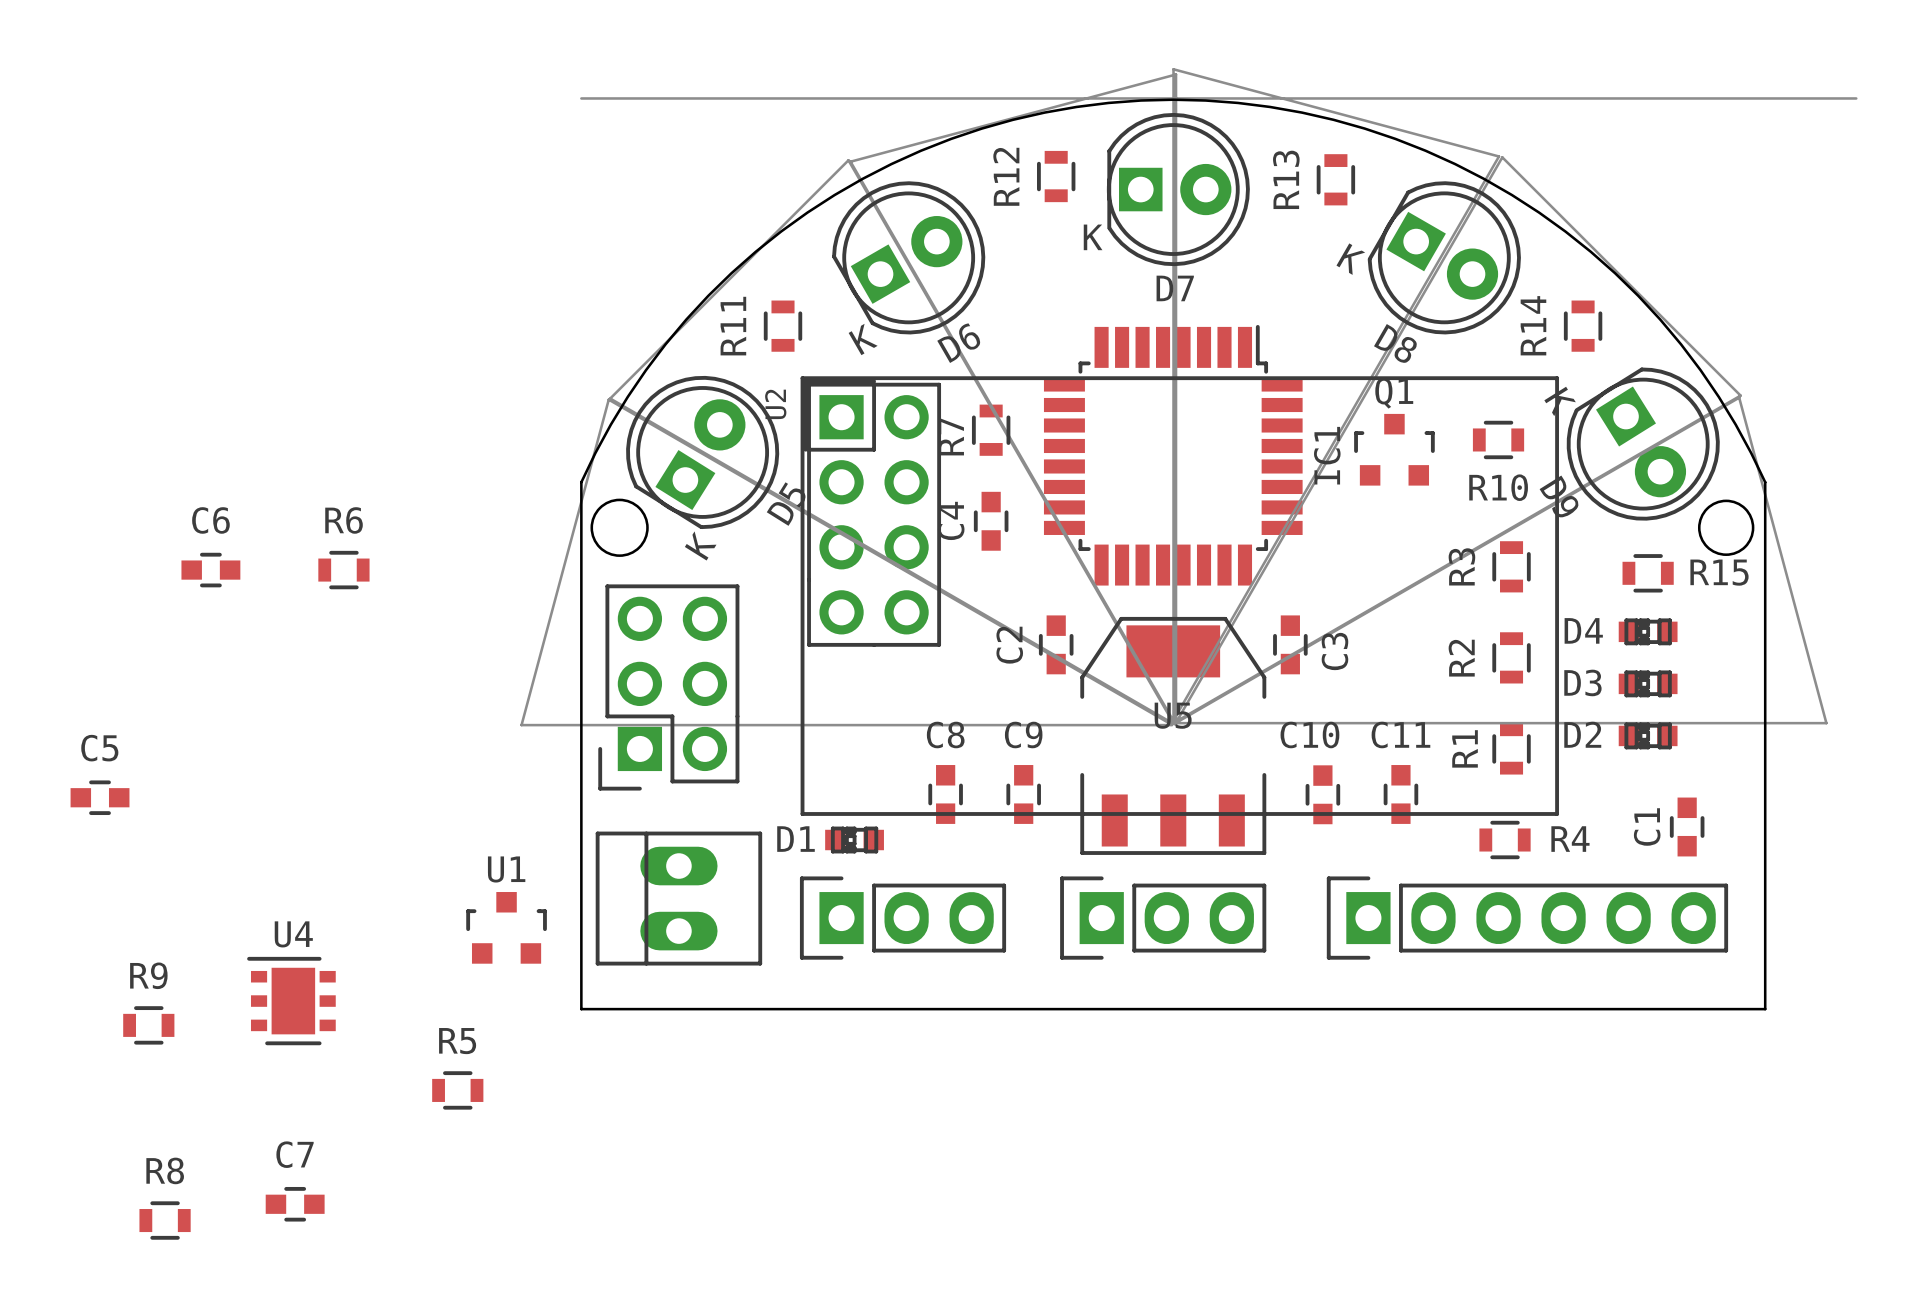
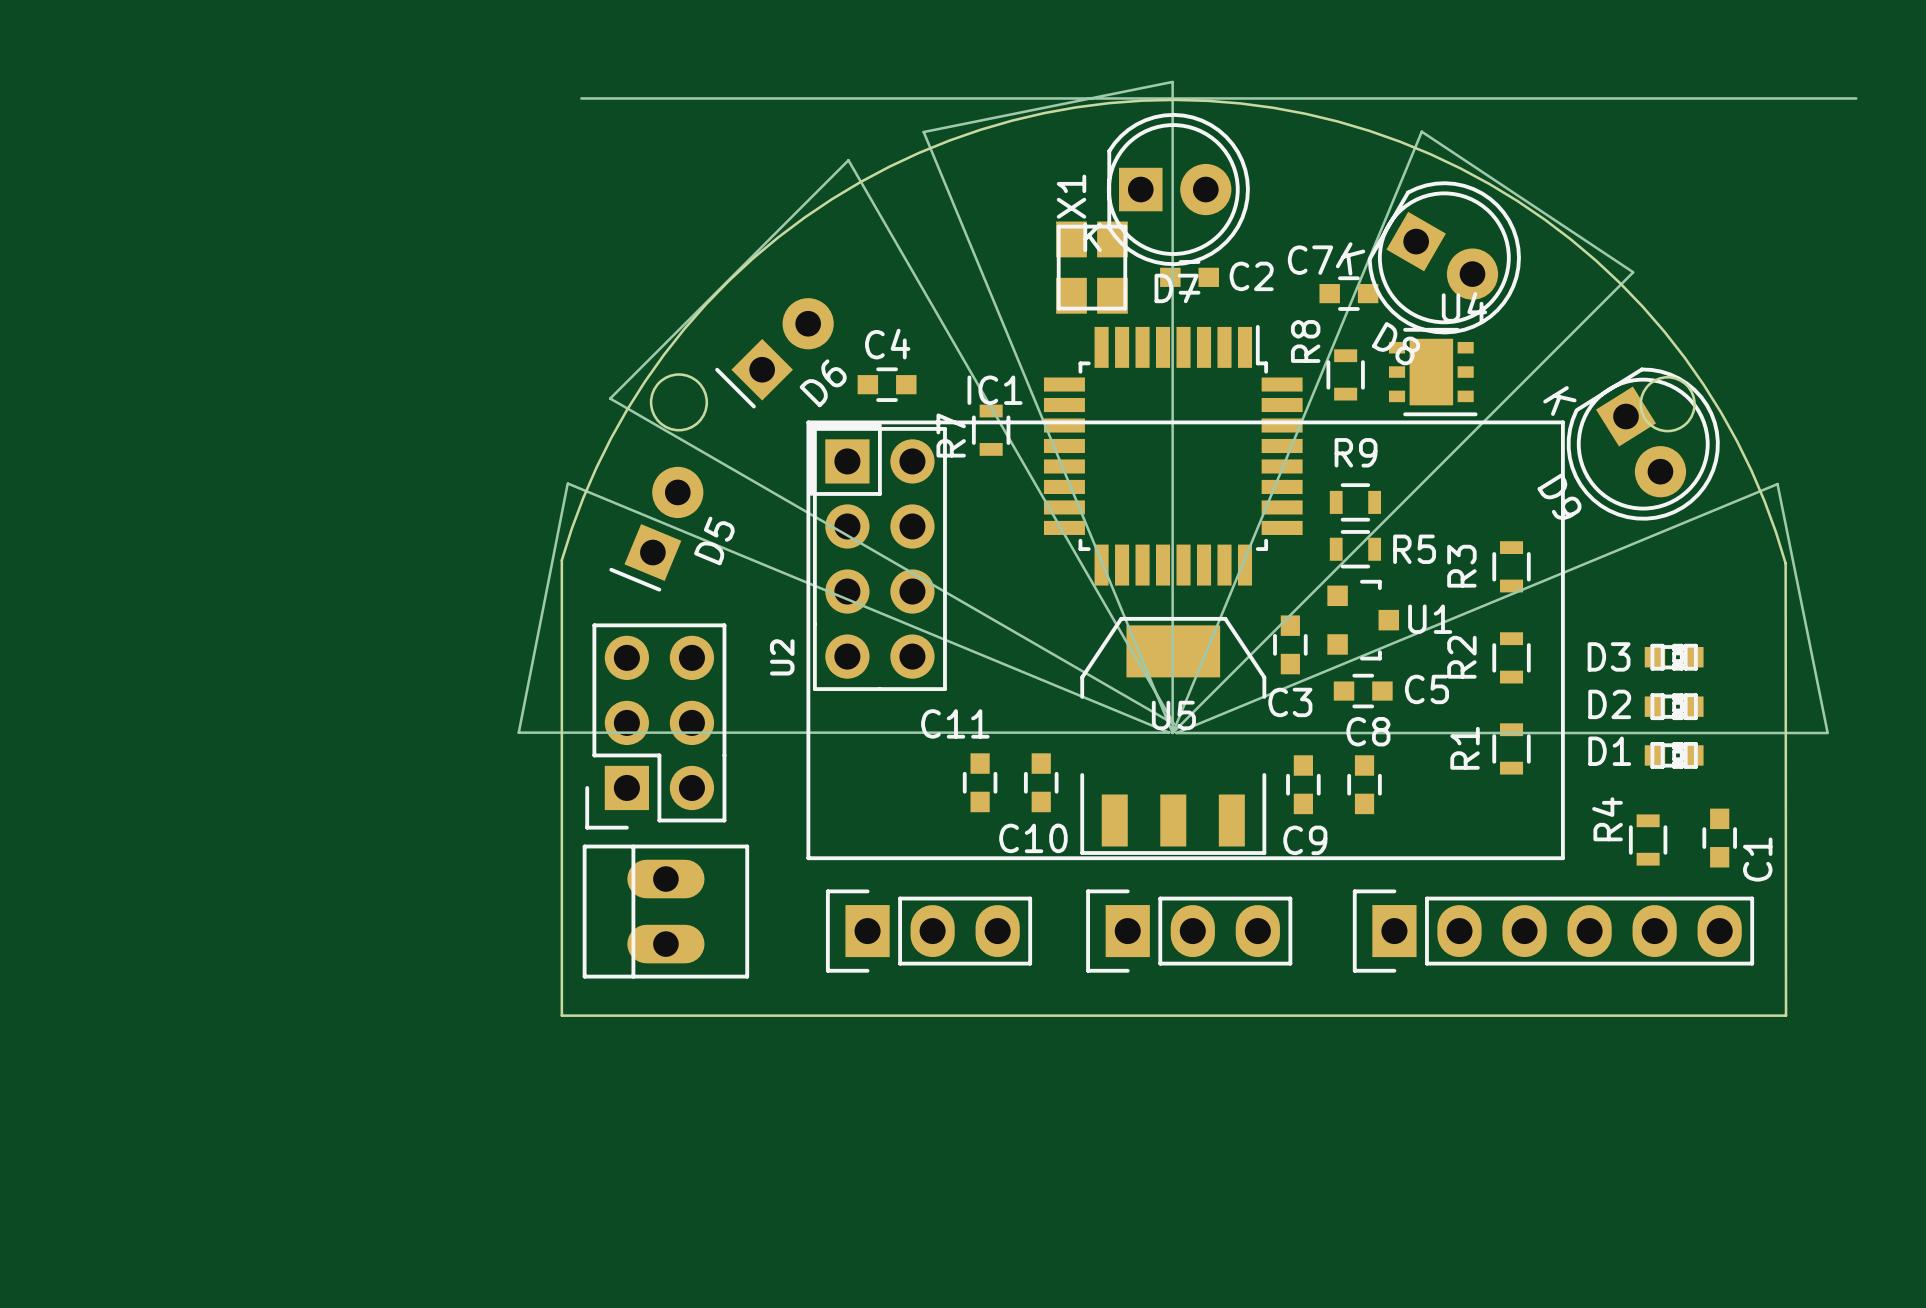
line: none -> (1172, 81) (923, 132) (1172, 732) (1172, 82)
R12: (1056, 176) -> none
R13: (1335, 179) -> none
D6 footprint: [832, 181, 986, 335] -> [715, 298, 834, 409]
X1: none -> (1091, 267)
line: none -> (1633, 272) (1421, 131) (1172, 732) (1632, 272)
R11: (783, 326) -> none
R14: (1583, 326) -> none
D6 name position: D6 (958, 343) -> D6 (823, 383)
D5 footprint: [626, 375, 780, 530] -> [609, 466, 704, 592]
U2 name position: U2 (775, 404) -> U2 (782, 657)
R10: (1498, 439) -> none
Q1: (1394, 449) -> none
IC1 name rotation: 0° (1327, 455) -> 90° clockwise (995, 390)
IC1 name position: IC1 (1327, 455) -> IC1 (995, 390)
board edge: (1765, 482) (1765, 1009) (581, 1009) (581, 482) (610, 424) (645, 370) (665, 344) (708, 295) (755, 251) (807, 212) (862, 178) (921, 150) (981, 128) (1044, 112) (1108, 102) (1173, 99) (1205, 100) (1270, 106) (1333, 119) (1395, 138) (1455, 164) (1512, 195) (1565, 231) (1615, 273) (1660, 319) (1700, 370) (1735, 424) (1751, 453) (1765, 482) -> (561, 560) (583, 497) (611, 438) (644, 381) (684, 329) (728, 280) (778, 237) (831, 199) (889, 166) (949, 140) (1012, 120) (1076, 107) (1142, 100) (1207, 100) (1273, 107) (1337, 121) (1400, 141) (1460, 168) (1517, 201) (1544, 219) (1596, 260) (1642, 306) (1684, 357) (1721, 412) (1751, 470) (1775, 532) (1785, 563) (1786, 1015) (561, 1015) (561, 560)
line: none -> (567, 483) (518, 732) (1169, 732) (568, 483)
C4 rotation: 0° (991, 521) -> 90° clockwise (887, 384)
C4 position: (991, 521) -> (887, 384)
round board edge position: (619, 527) -> (678, 402)
round board edge position: (1726, 527) -> (1667, 404)
C6: (210, 570) -> none
R6: (343, 570) -> none
R15: (1648, 573) -> none
U2 position: (1179, 596) -> (1185, 640)
D4: (1648, 631) -> none
C2 rotation: 0° (1056, 644) -> 90° clockwise (1189, 277)
C2 position: (1056, 644) -> (1189, 277)
C2 name position: C2 (1009, 645) -> C2 (1251, 276)
C3 name rotation: 0° (1334, 651) -> 90° clockwise (1290, 702)
C3 name position: C3 (1334, 651) -> C3 (1290, 702)
D3 rotation: 0° (1648, 683) -> 180° (1674, 657)
D3 position: (1648, 683) -> (1674, 657)
part position: (668, 687) -> (655, 726)
line: (1173, 719) (1173, 69) (1498, 156) (1173, 719) -> none
line: (1177, 720) (1502, 157) (1740, 395) (1177, 720) -> none
line: (1175, 722) (1739, 397) (1826, 723) (1175, 723) -> none
line: (1172, 724) (608, 399) (521, 725) (1172, 725) -> none
line: (1176, 724) (1176, 74) (850, 161) (1175, 725) -> none
line: none -> (1827, 733) (1176, 733) (1777, 484) (1827, 733)
C8 name position: C8 (945, 734) -> C8 (1368, 731)
C9 name position: C9 (1023, 734) -> C9 (1305, 840)
C10 name position: C10 (1309, 734) -> C10 (1033, 838)
C11 name position: C11 (1400, 734) -> C11 (955, 723)
D2 rotation: 0° (1648, 735) -> 180° (1674, 706)
D2 position: (1648, 735) -> (1674, 706)
C5 name position: C5 (99, 748) -> C5 (1426, 689)
C8 position: (945, 794) -> (1364, 784)
C9 position: (1023, 794) -> (1303, 784)
C10 position: (1322, 794) -> (1041, 782)
C11 position: (1400, 794) -> (980, 782)
C5 position: (100, 797) -> (1363, 691)
C1 name position: C1 (1647, 826) -> C1 (1757, 859)
C1 position: (1687, 826) -> (1719, 838)
R4 name position: R4 (1570, 839) -> R4 (1607, 819)
D1 rotation: 0° (854, 840) -> 180° (1674, 755)
D1 position: (854, 840) -> (1674, 755)
R4 rotation: 0° (1505, 840) -> 90° clockwise (1648, 840)
R4 position: (1505, 840) -> (1648, 840)
part position: (678, 898) -> (665, 911)
part position: (903, 918) -> (929, 931)
part position: (1163, 918) -> (1189, 931)
part position: (1527, 918) -> (1553, 931)
U1 rotation: 0° (506, 927) -> 90° clockwise (1363, 620)
U1 position: (506, 927) -> (1363, 620)
U4 rotation: 0° (291, 1001) -> 180° (1433, 372)
U4 position: (291, 1001) -> (1433, 372)
R9 position: (148, 1025) -> (1355, 502)
R5 name position: R5 (457, 1041) -> R5 (1414, 549)
R5 position: (457, 1090) -> (1355, 549)
C7 name position: C7 (295, 1154) -> C7 (1310, 260)
C7 position: (295, 1204) -> (1348, 293)
R8 rotation: 0° (165, 1220) -> 90° clockwise (1345, 374)
R8 position: (165, 1220) -> (1345, 374)

